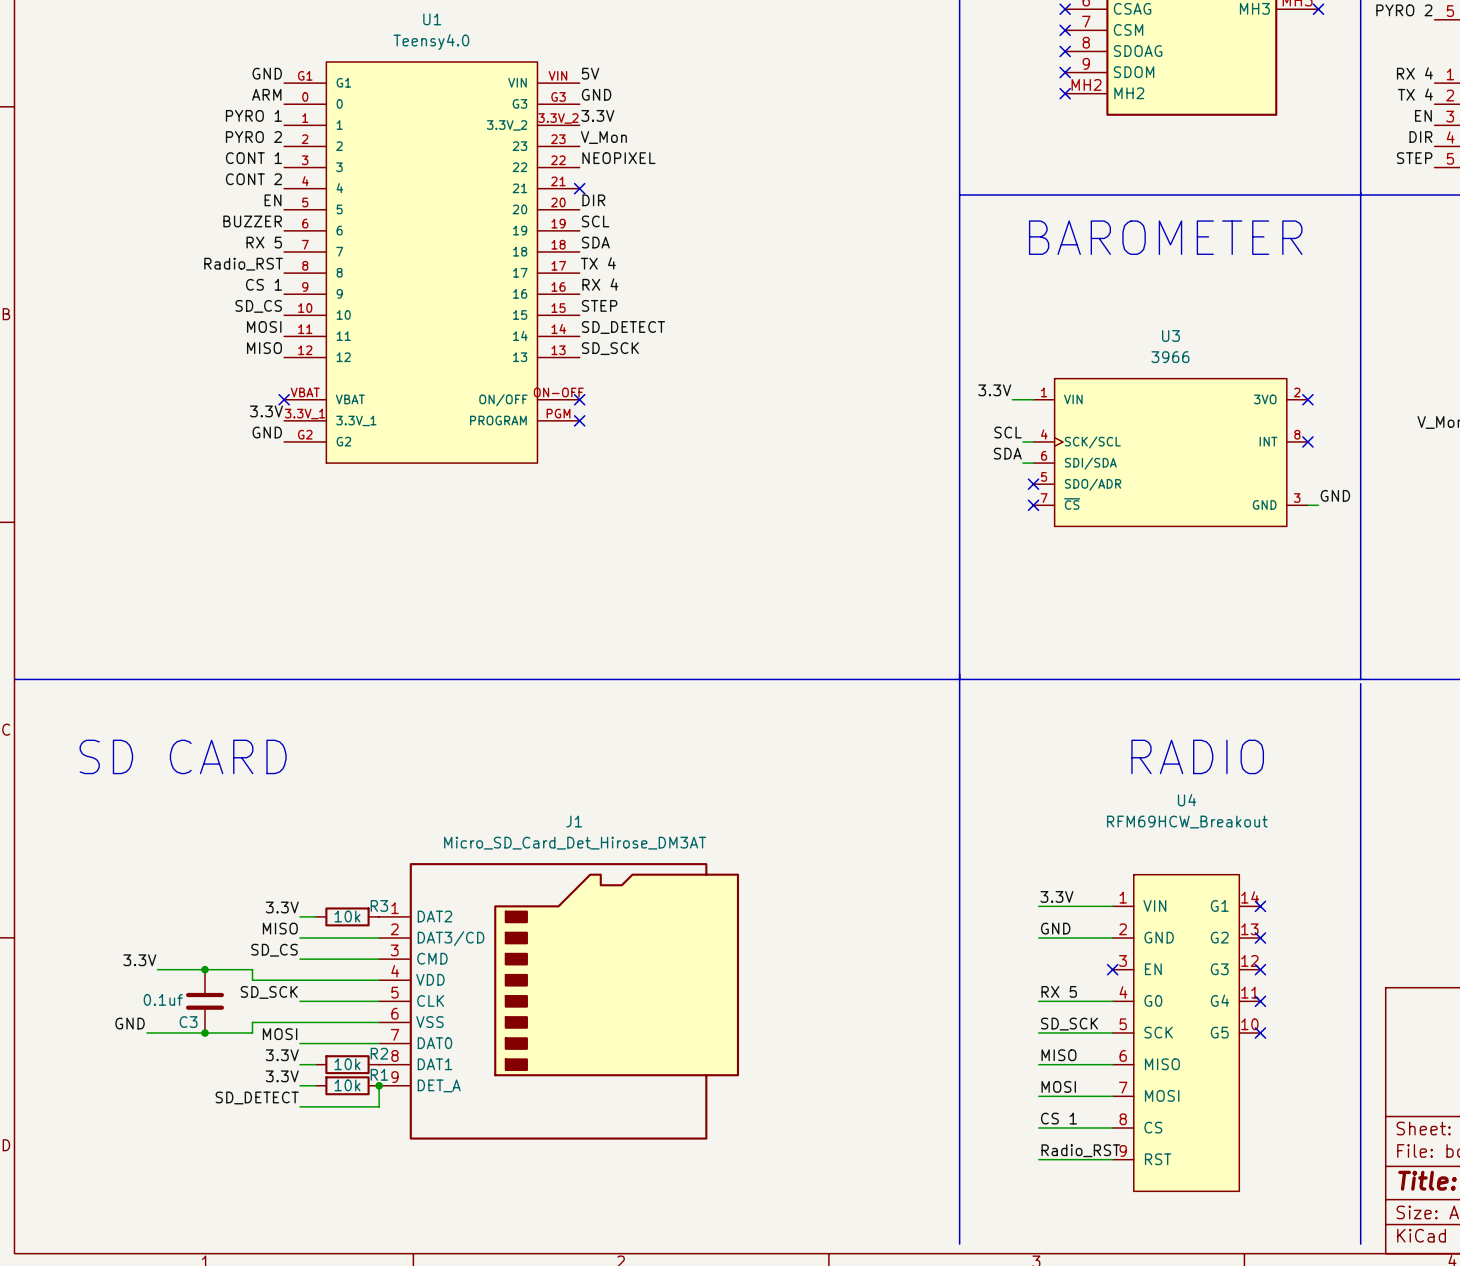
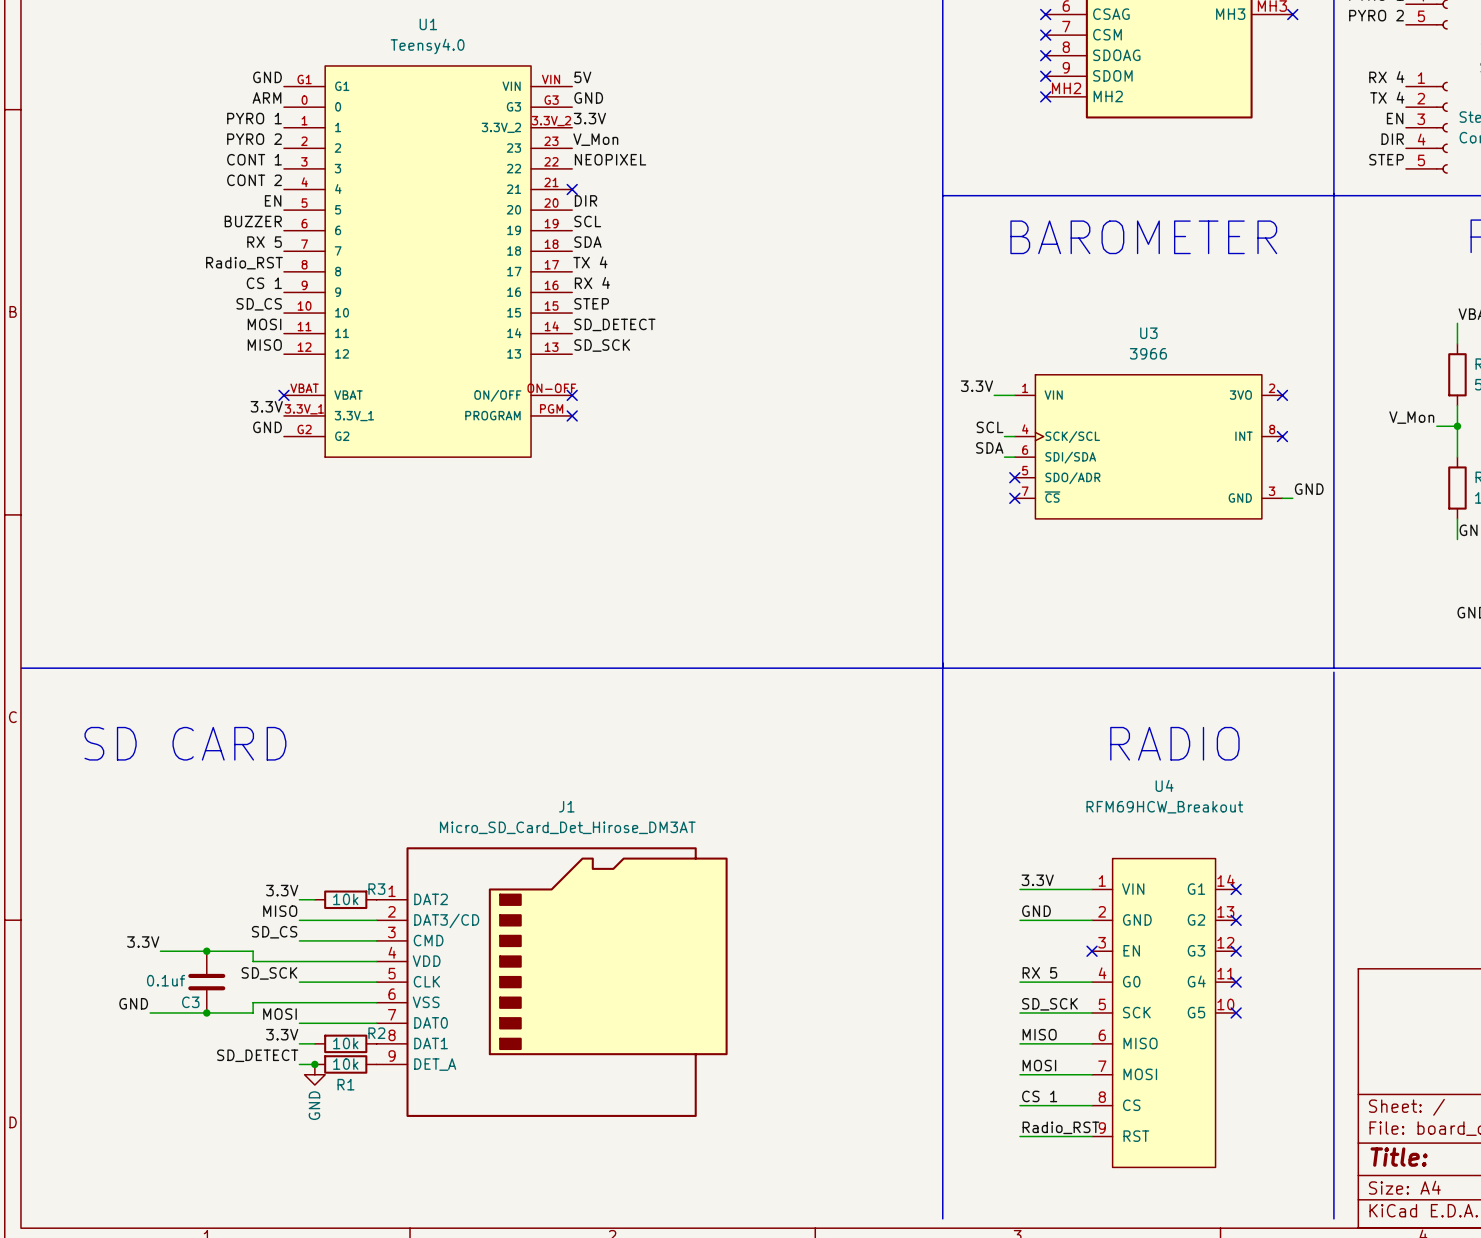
R1 name position: R1 (379, 1074) -> R1 (345, 1084)
label: 3.3V (282, 1076) -> SD_DETECT (257, 1055)
junction: none -> (314, 1064)
wire: (379, 1085) (379, 1106) (299, 1106) -> none
junction: (379, 1085) -> none
power symbol: none -> GND (314, 1074)
label: SD_DETECT (257, 1097) -> none

